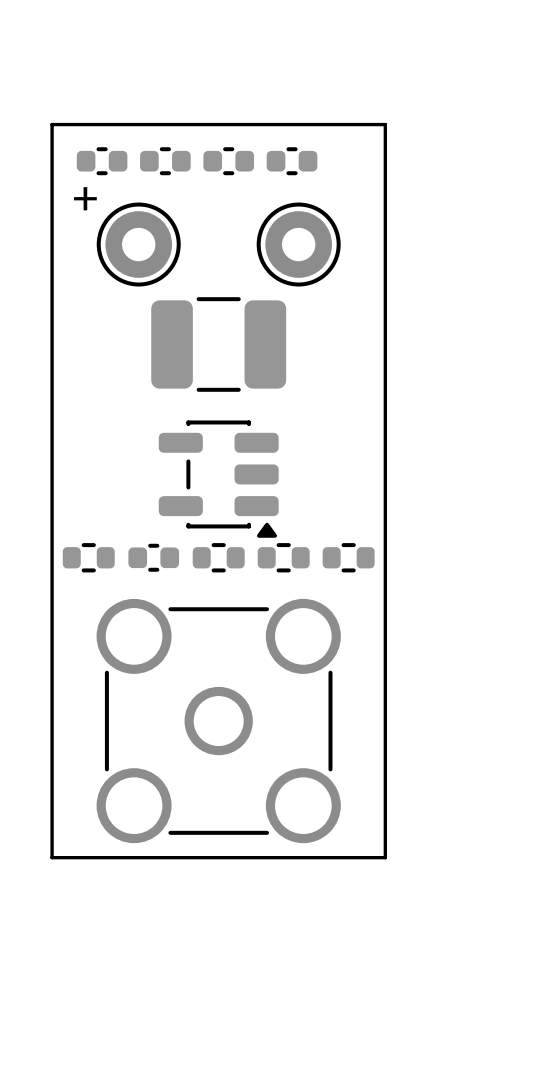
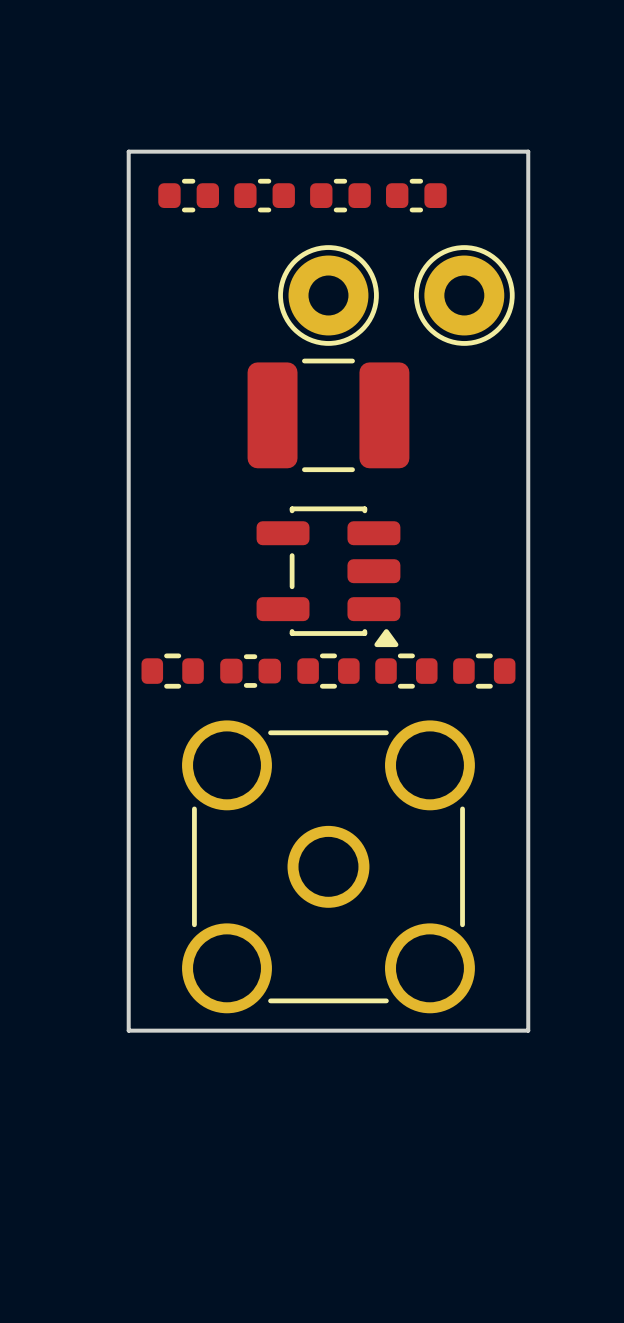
text: + (85, 198) -> none
part position: (138, 244) -> (328, 295)
part position: (298, 244) -> (464, 295)

